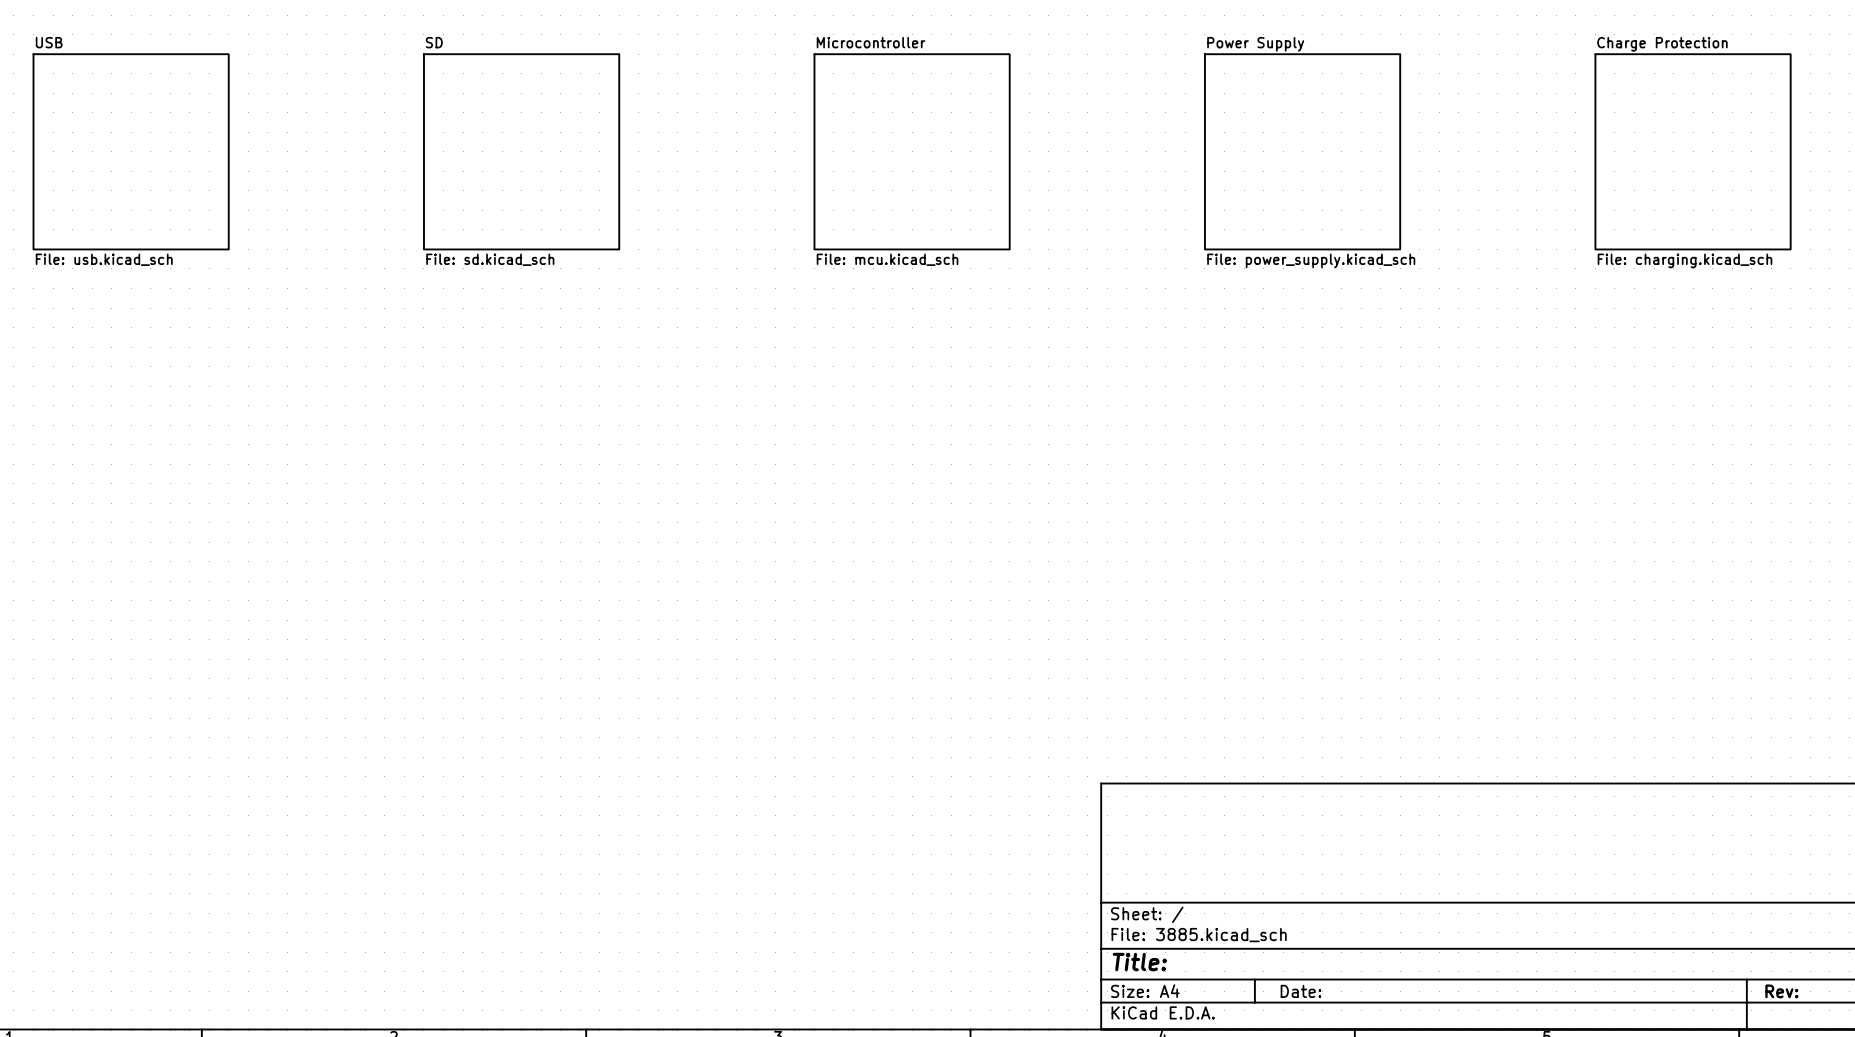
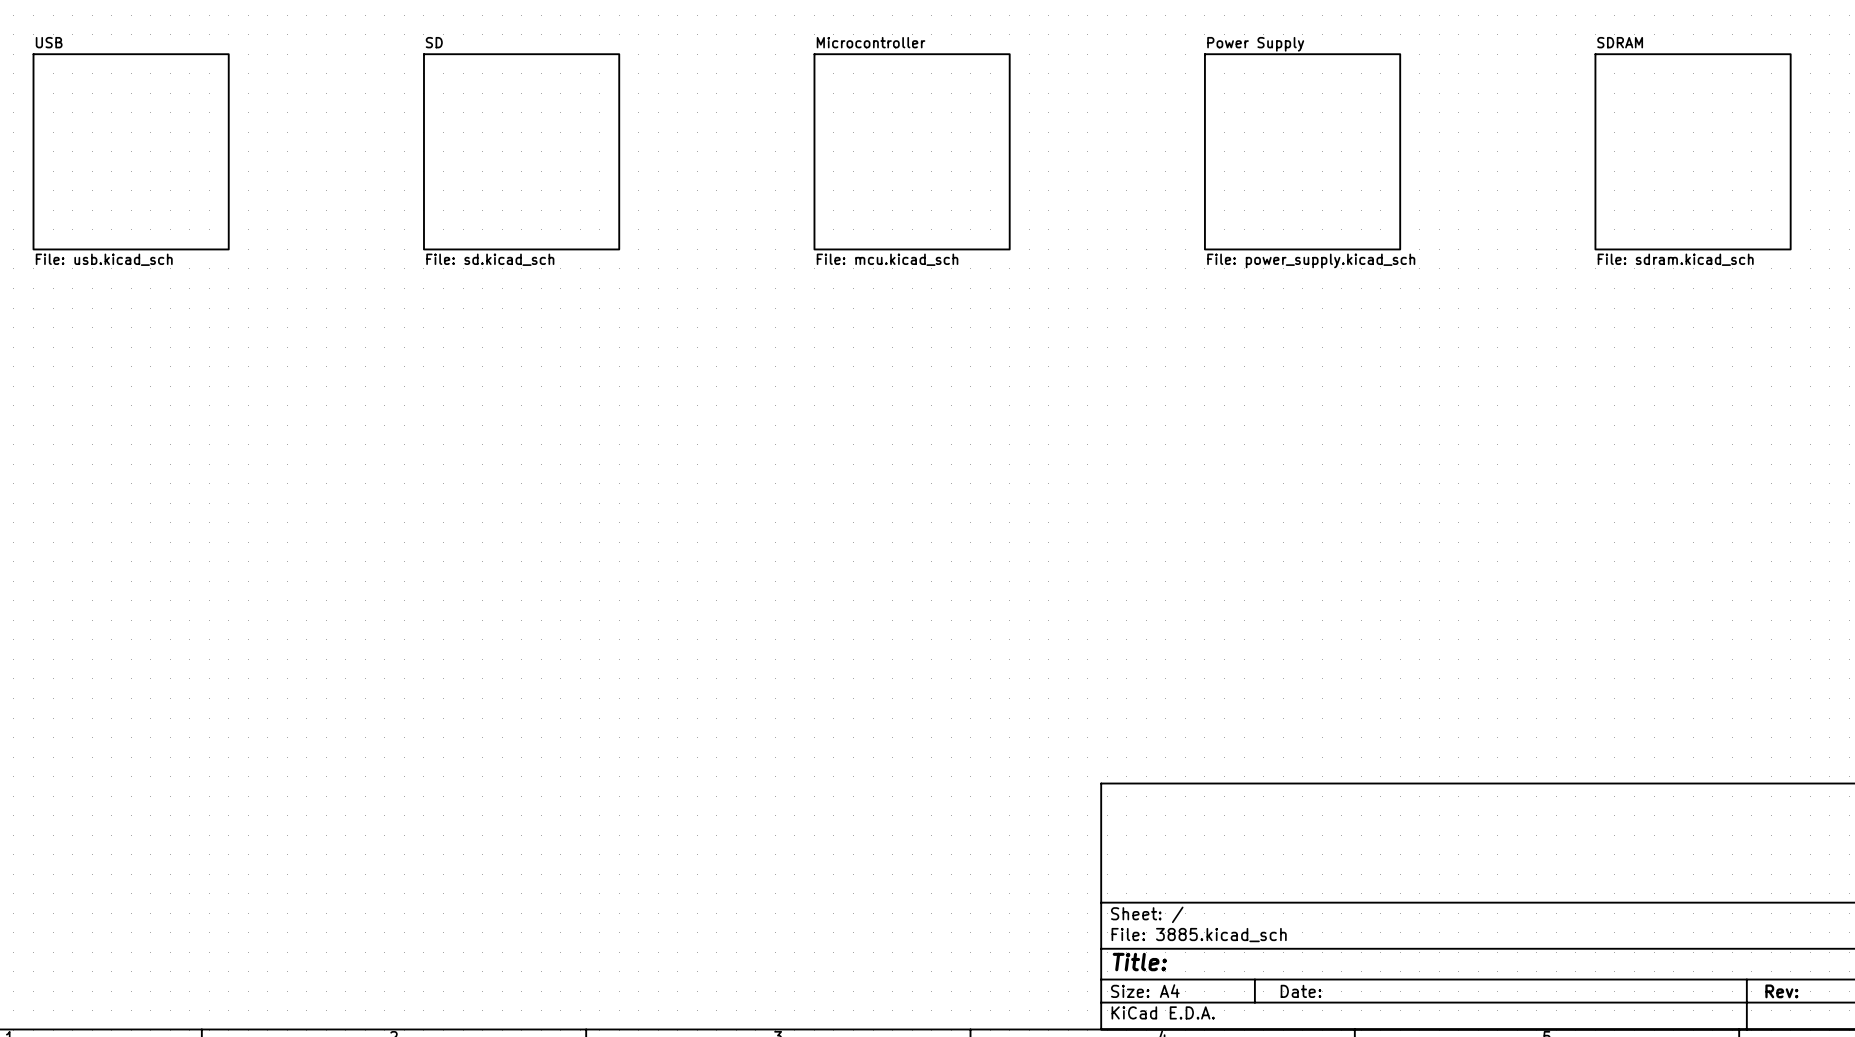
sheet Charge Protection name: Charge Protection (1662, 44) -> SDRAM (1620, 42)
sheet Charge Protection value: File: charging.kicad_sch (1684, 260) -> File: sdram.kicad_sch (1675, 259)

